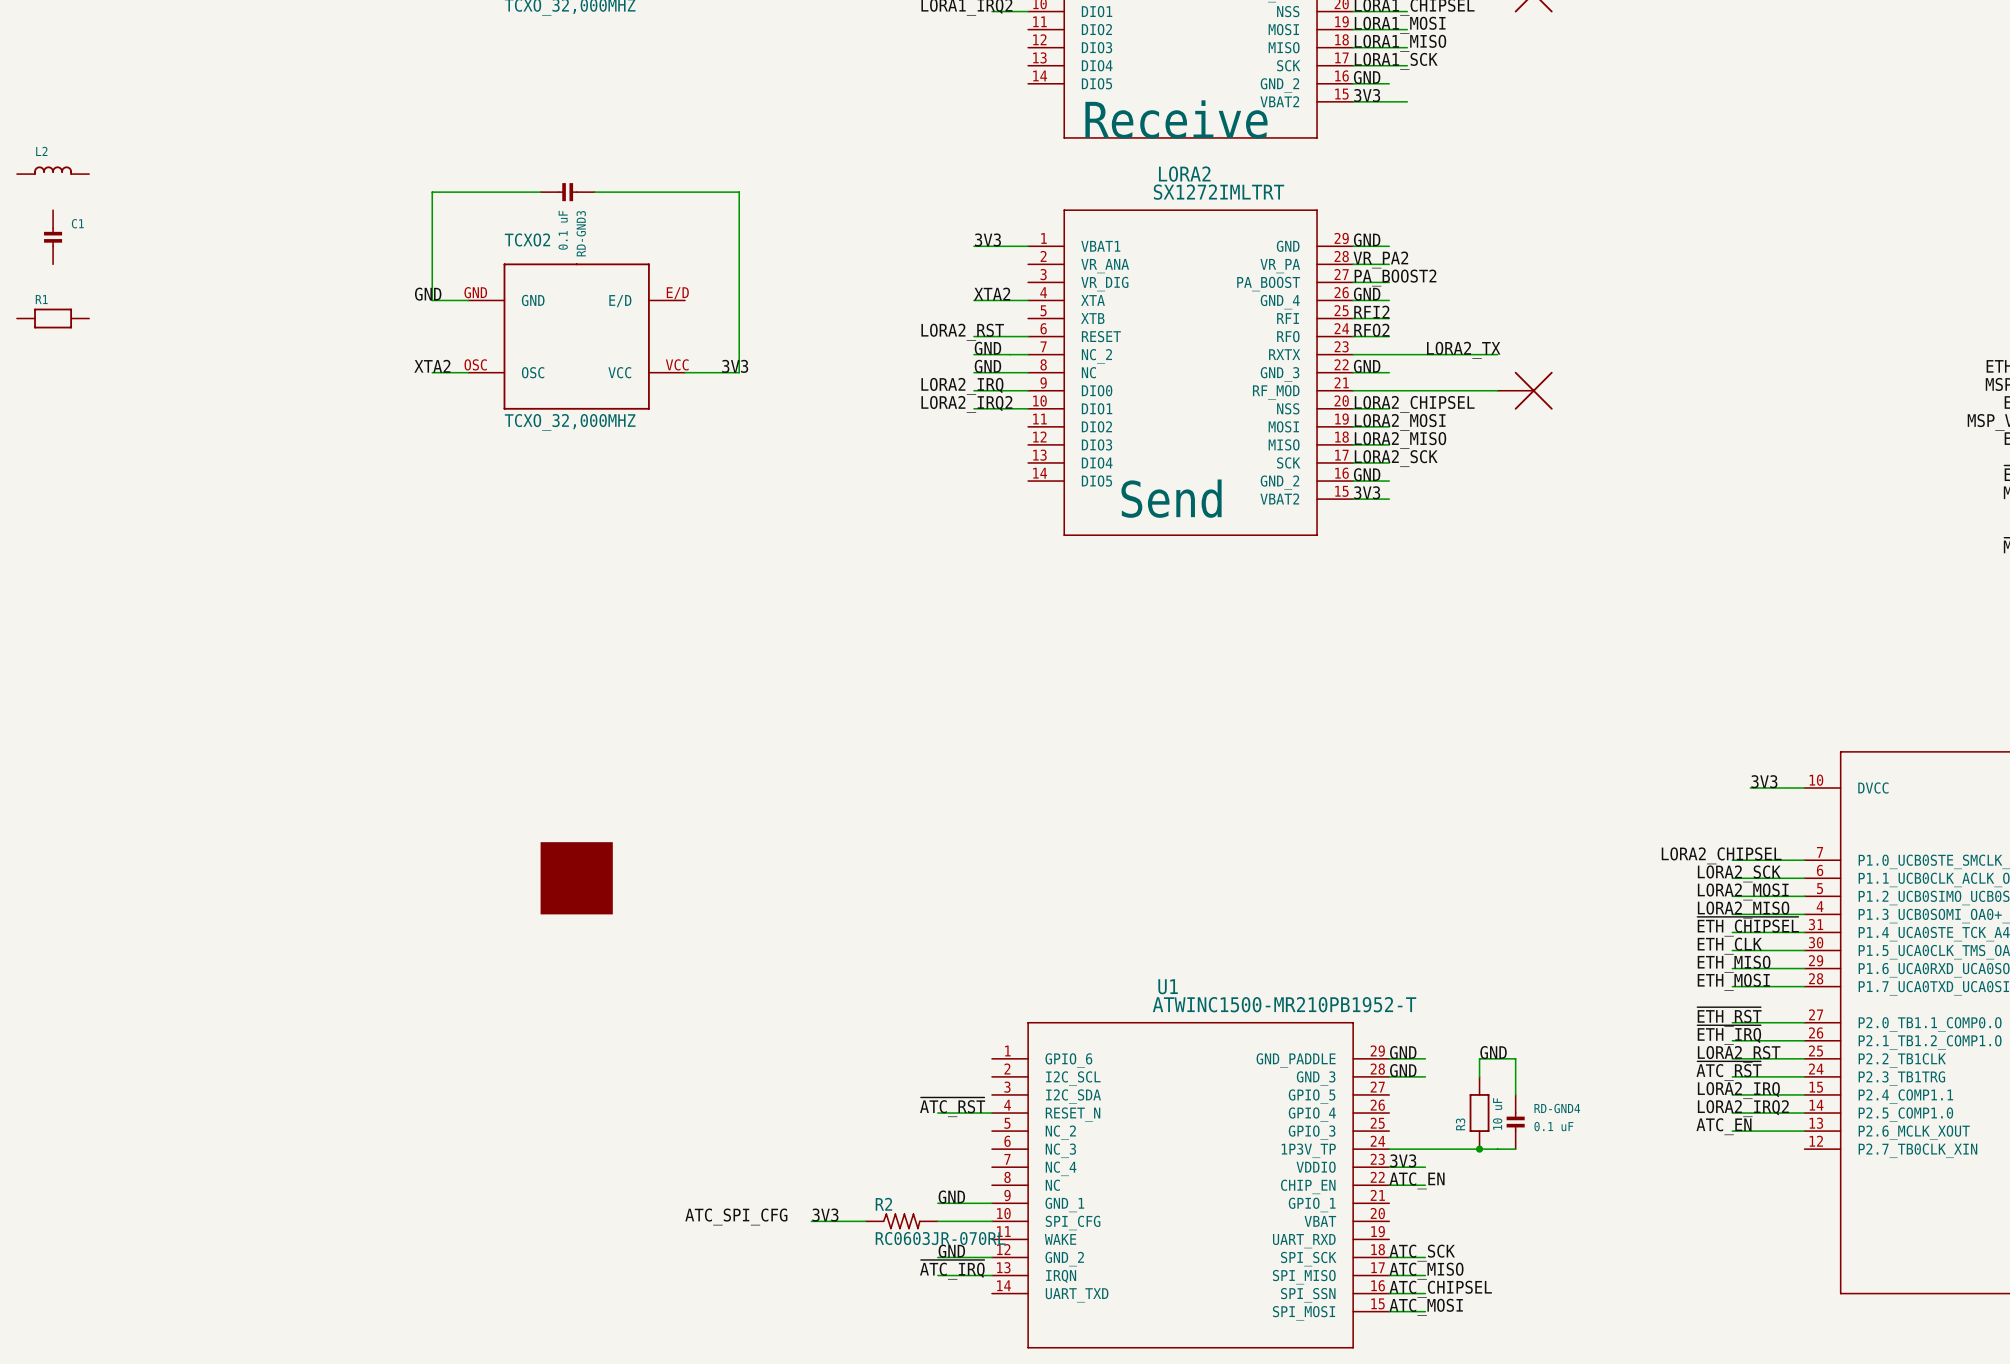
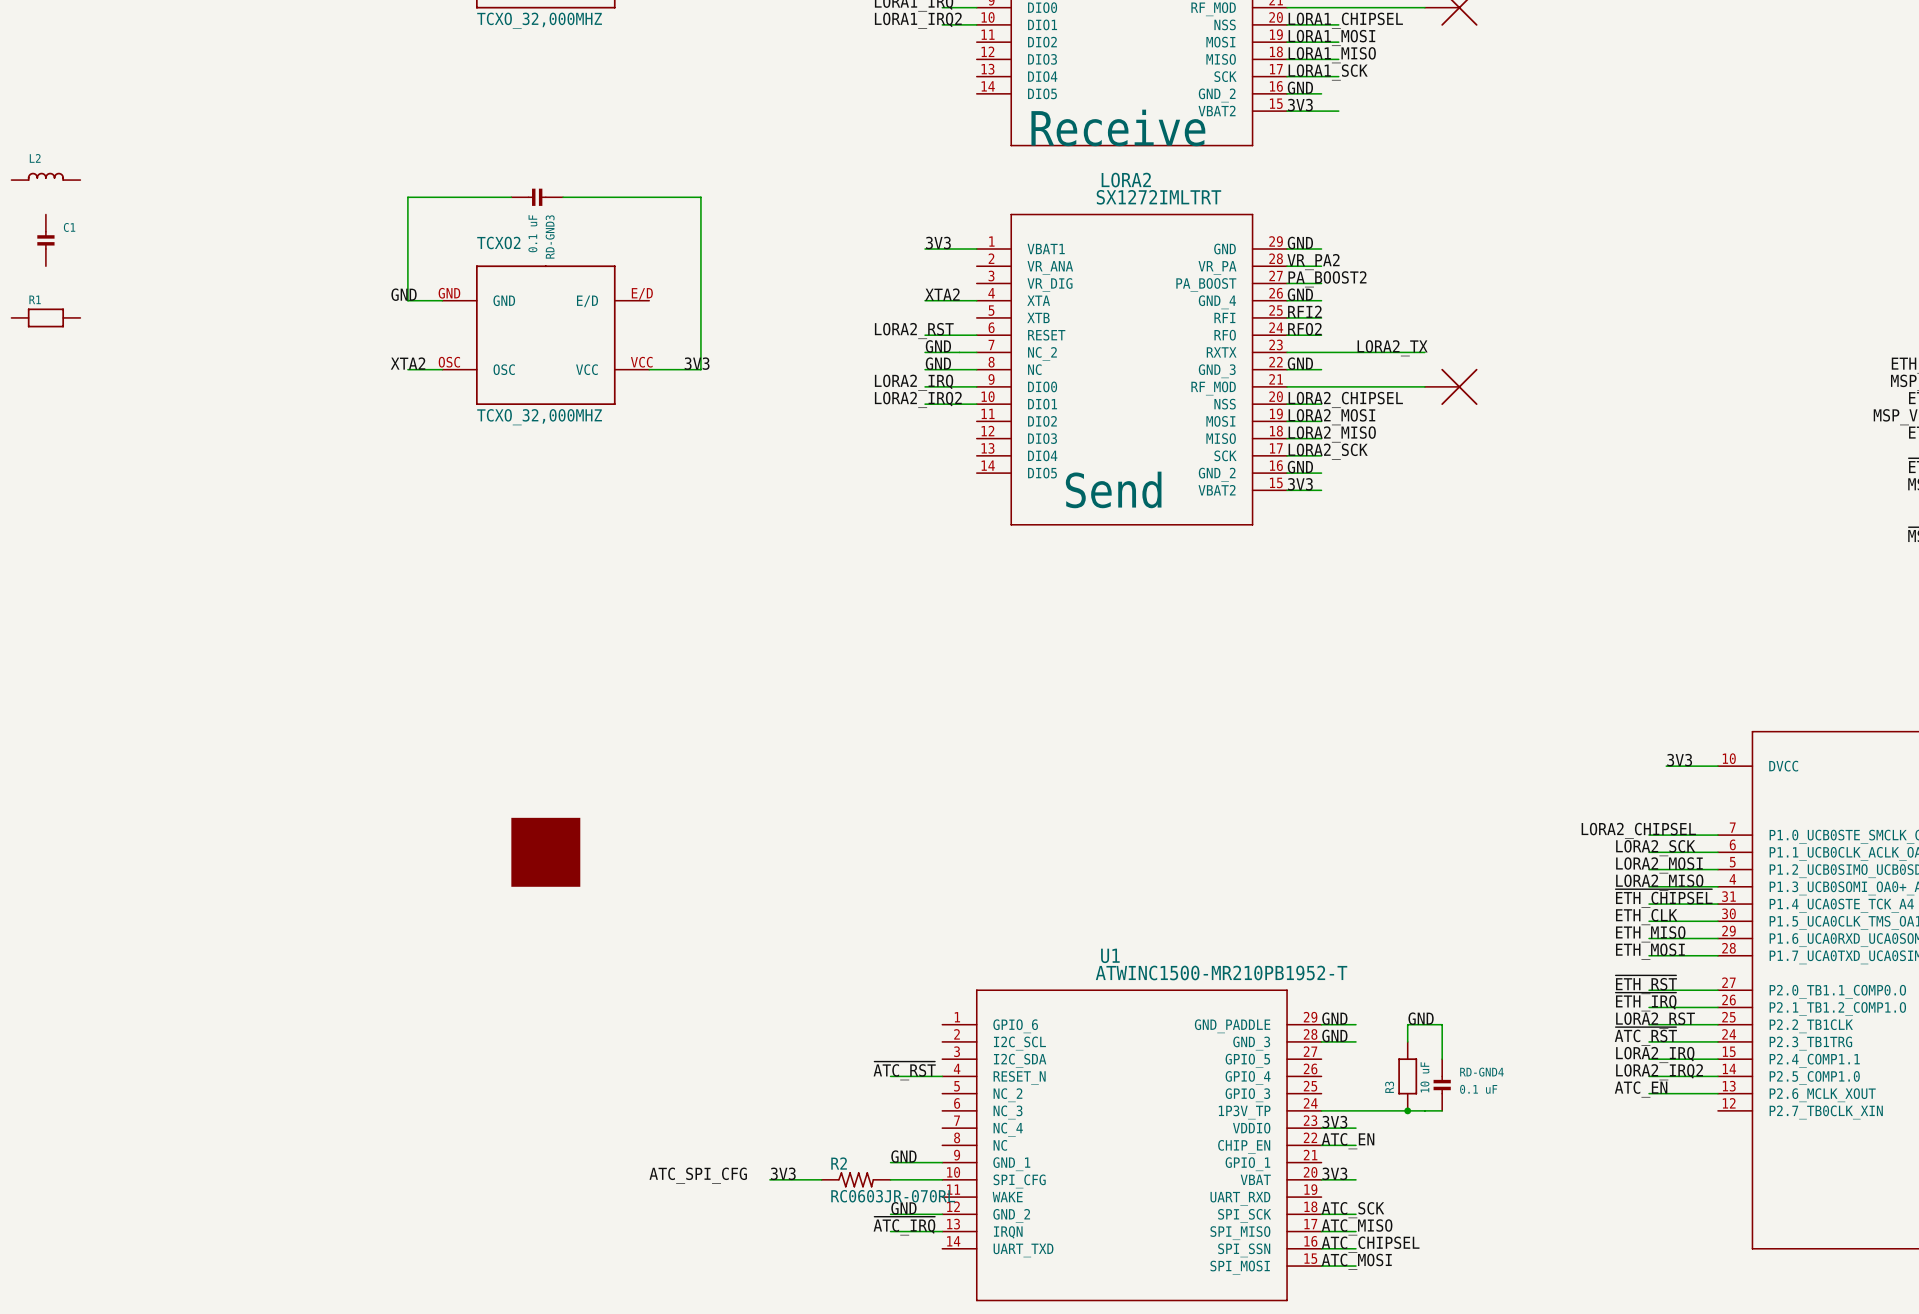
label: none -> 3V3 (1334, 1173)
wire: none -> (1321, 1179) (1355, 1179)

